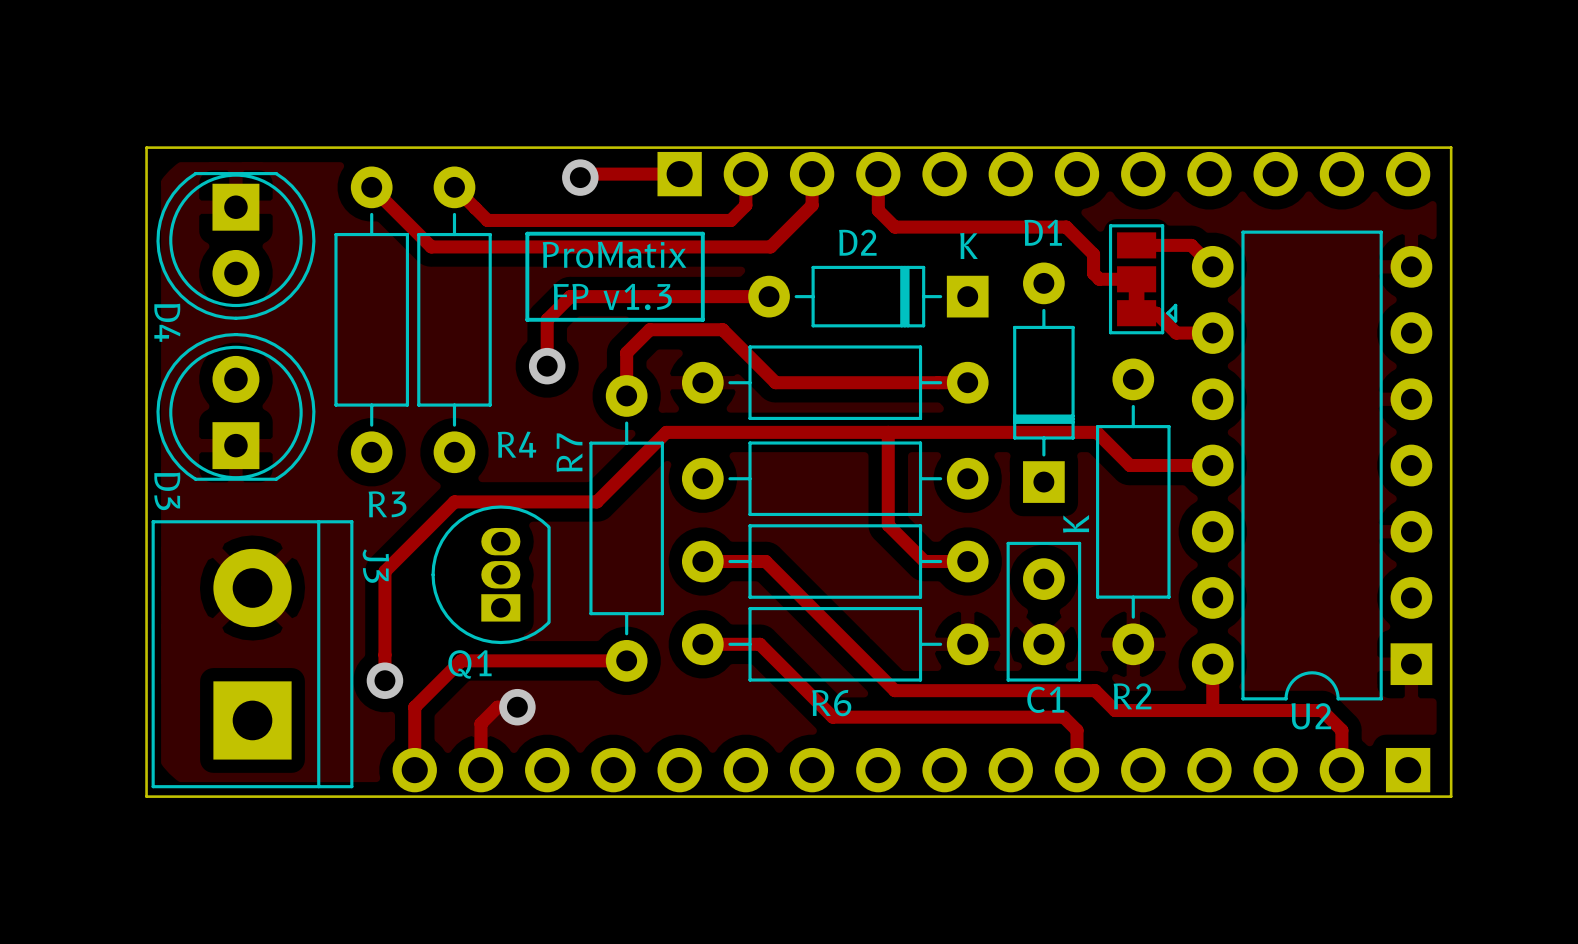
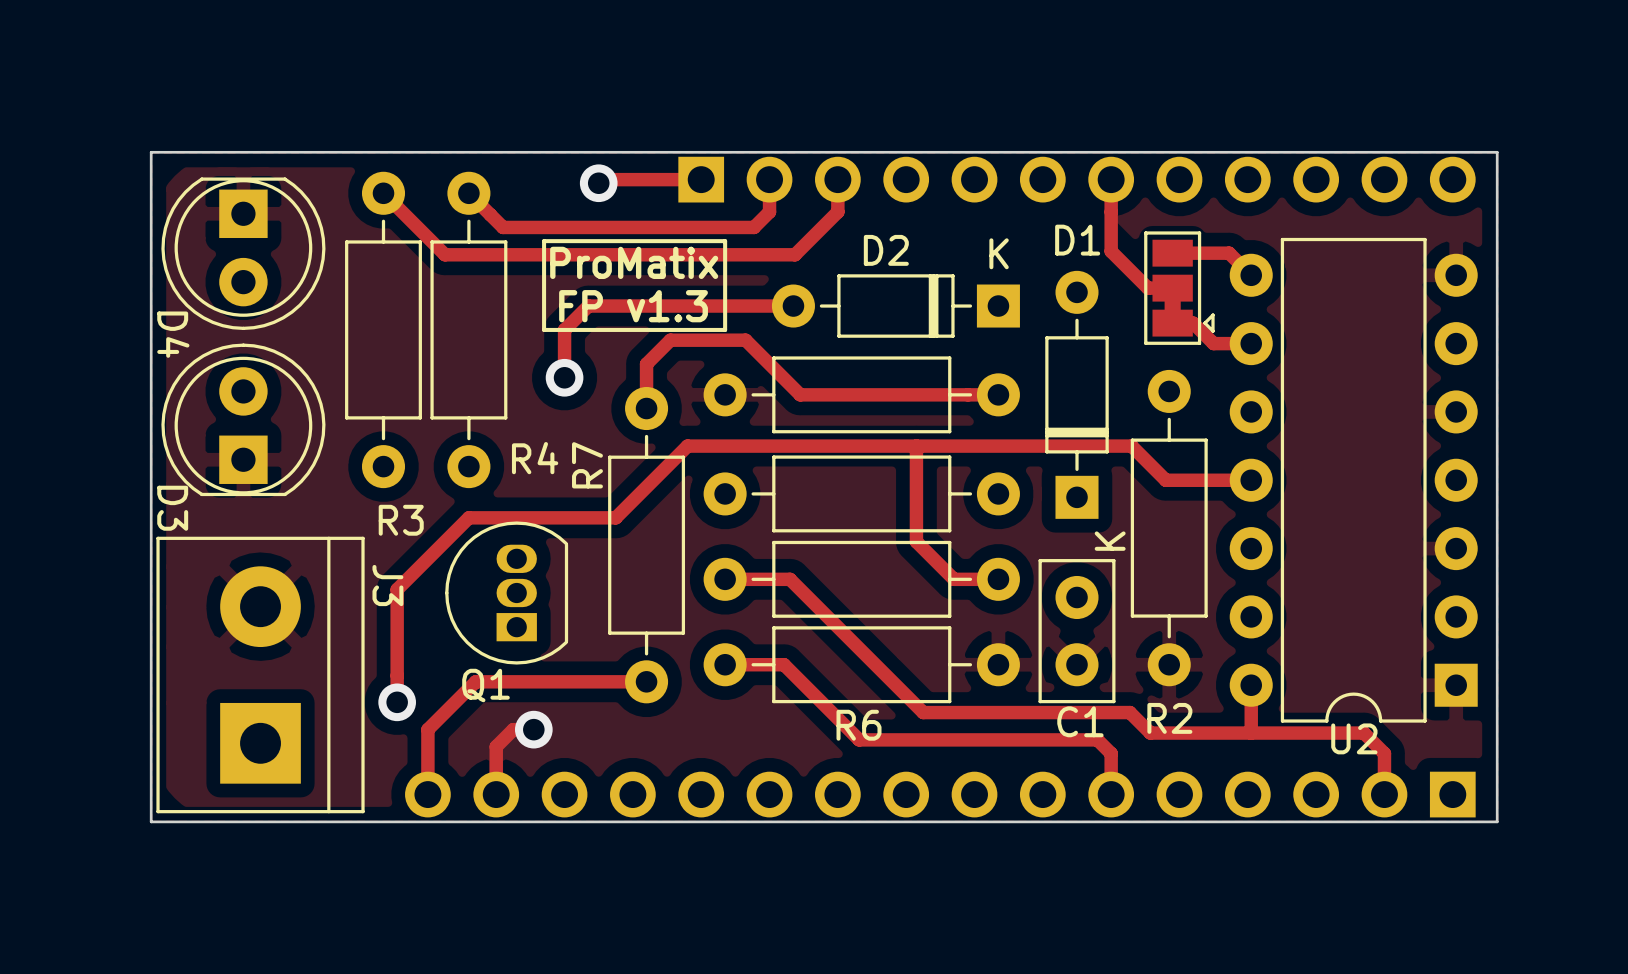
track: (878, 174) (878, 210) (894, 227) (1066, 227) (1093, 254) (1093, 273) (1099, 279) (1112, 279) -> (1111, 179) (1111, 251) (1147, 288)

